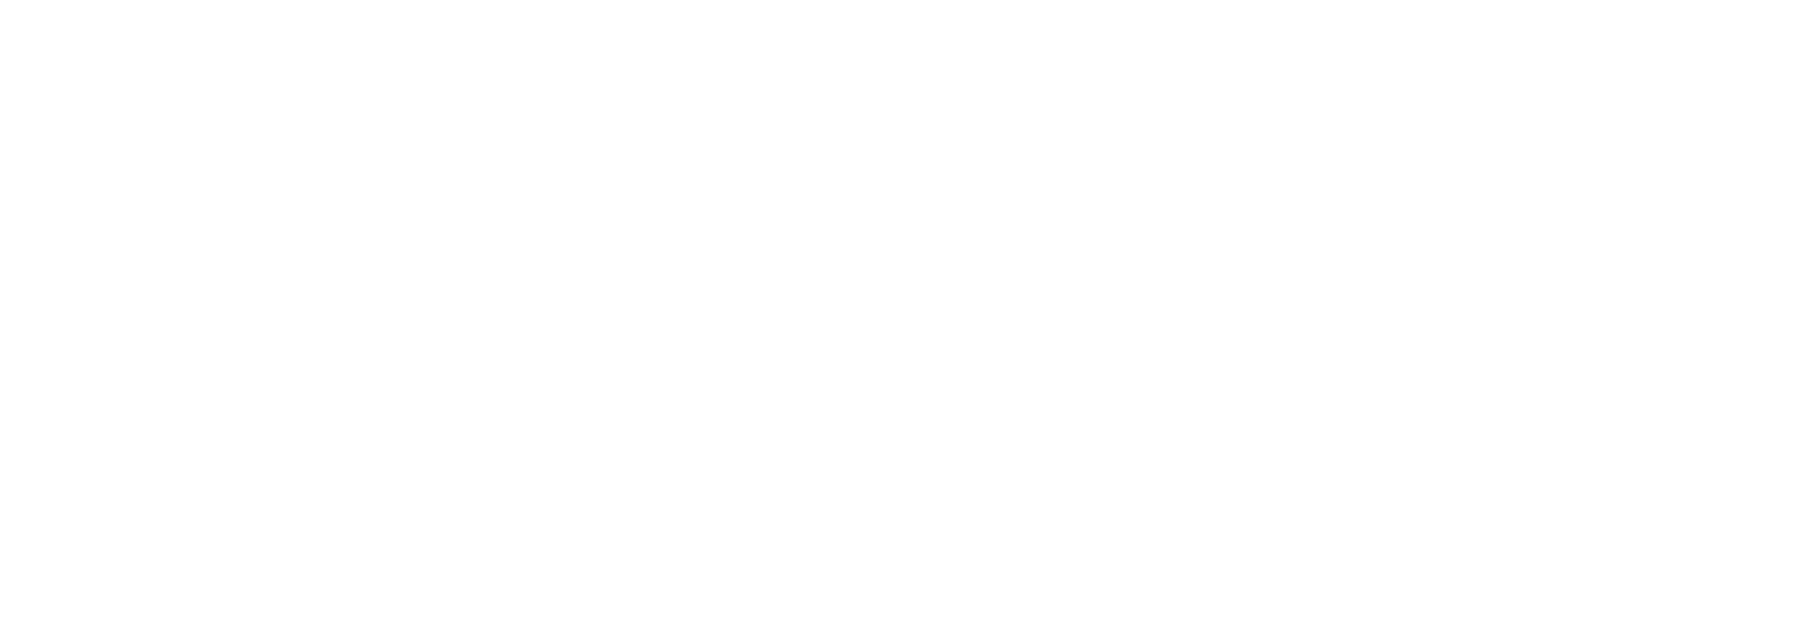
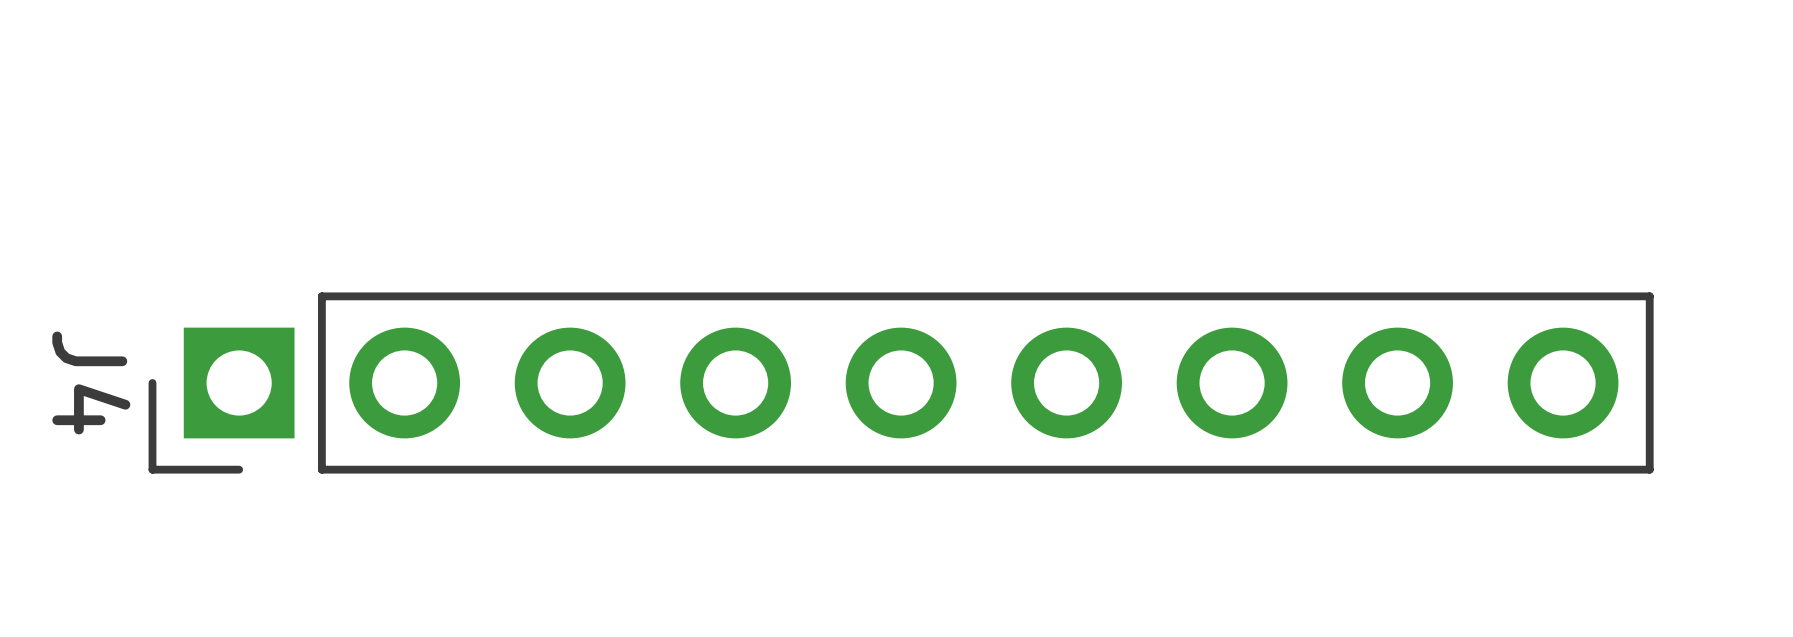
J4: none -> (901, 383)

